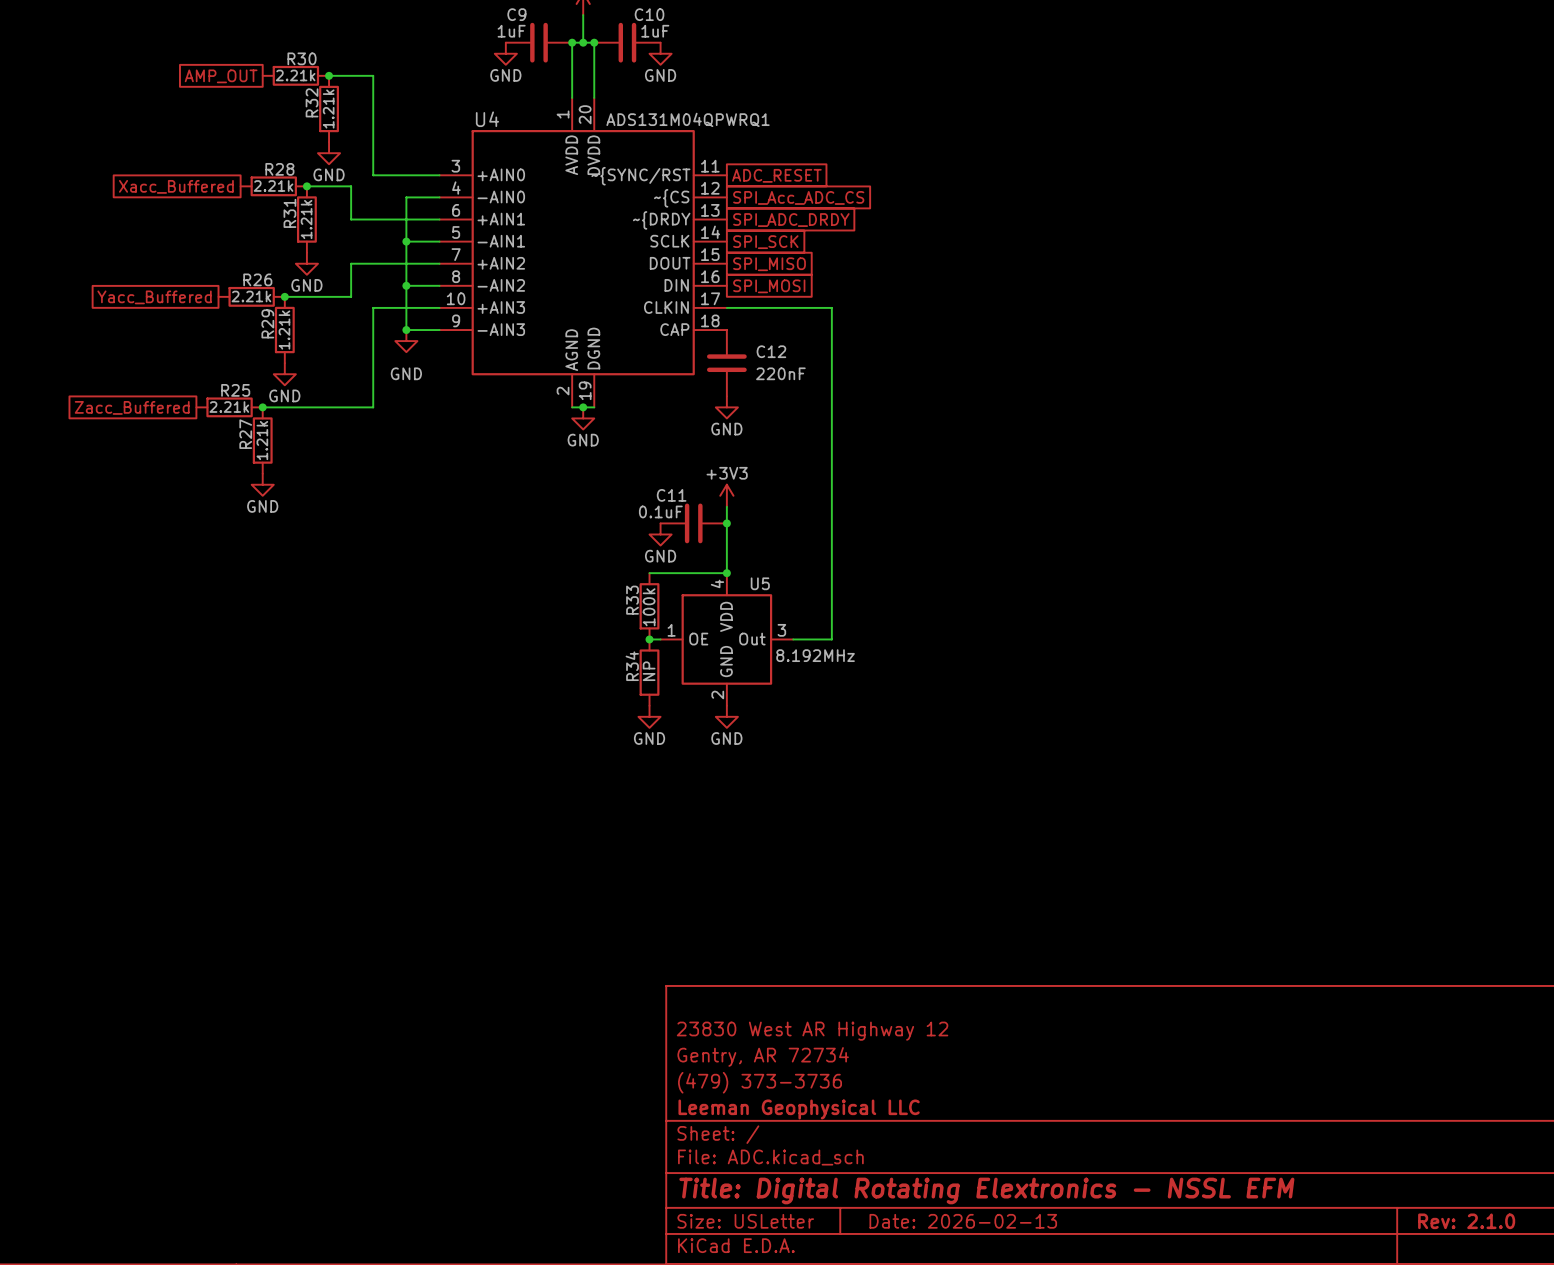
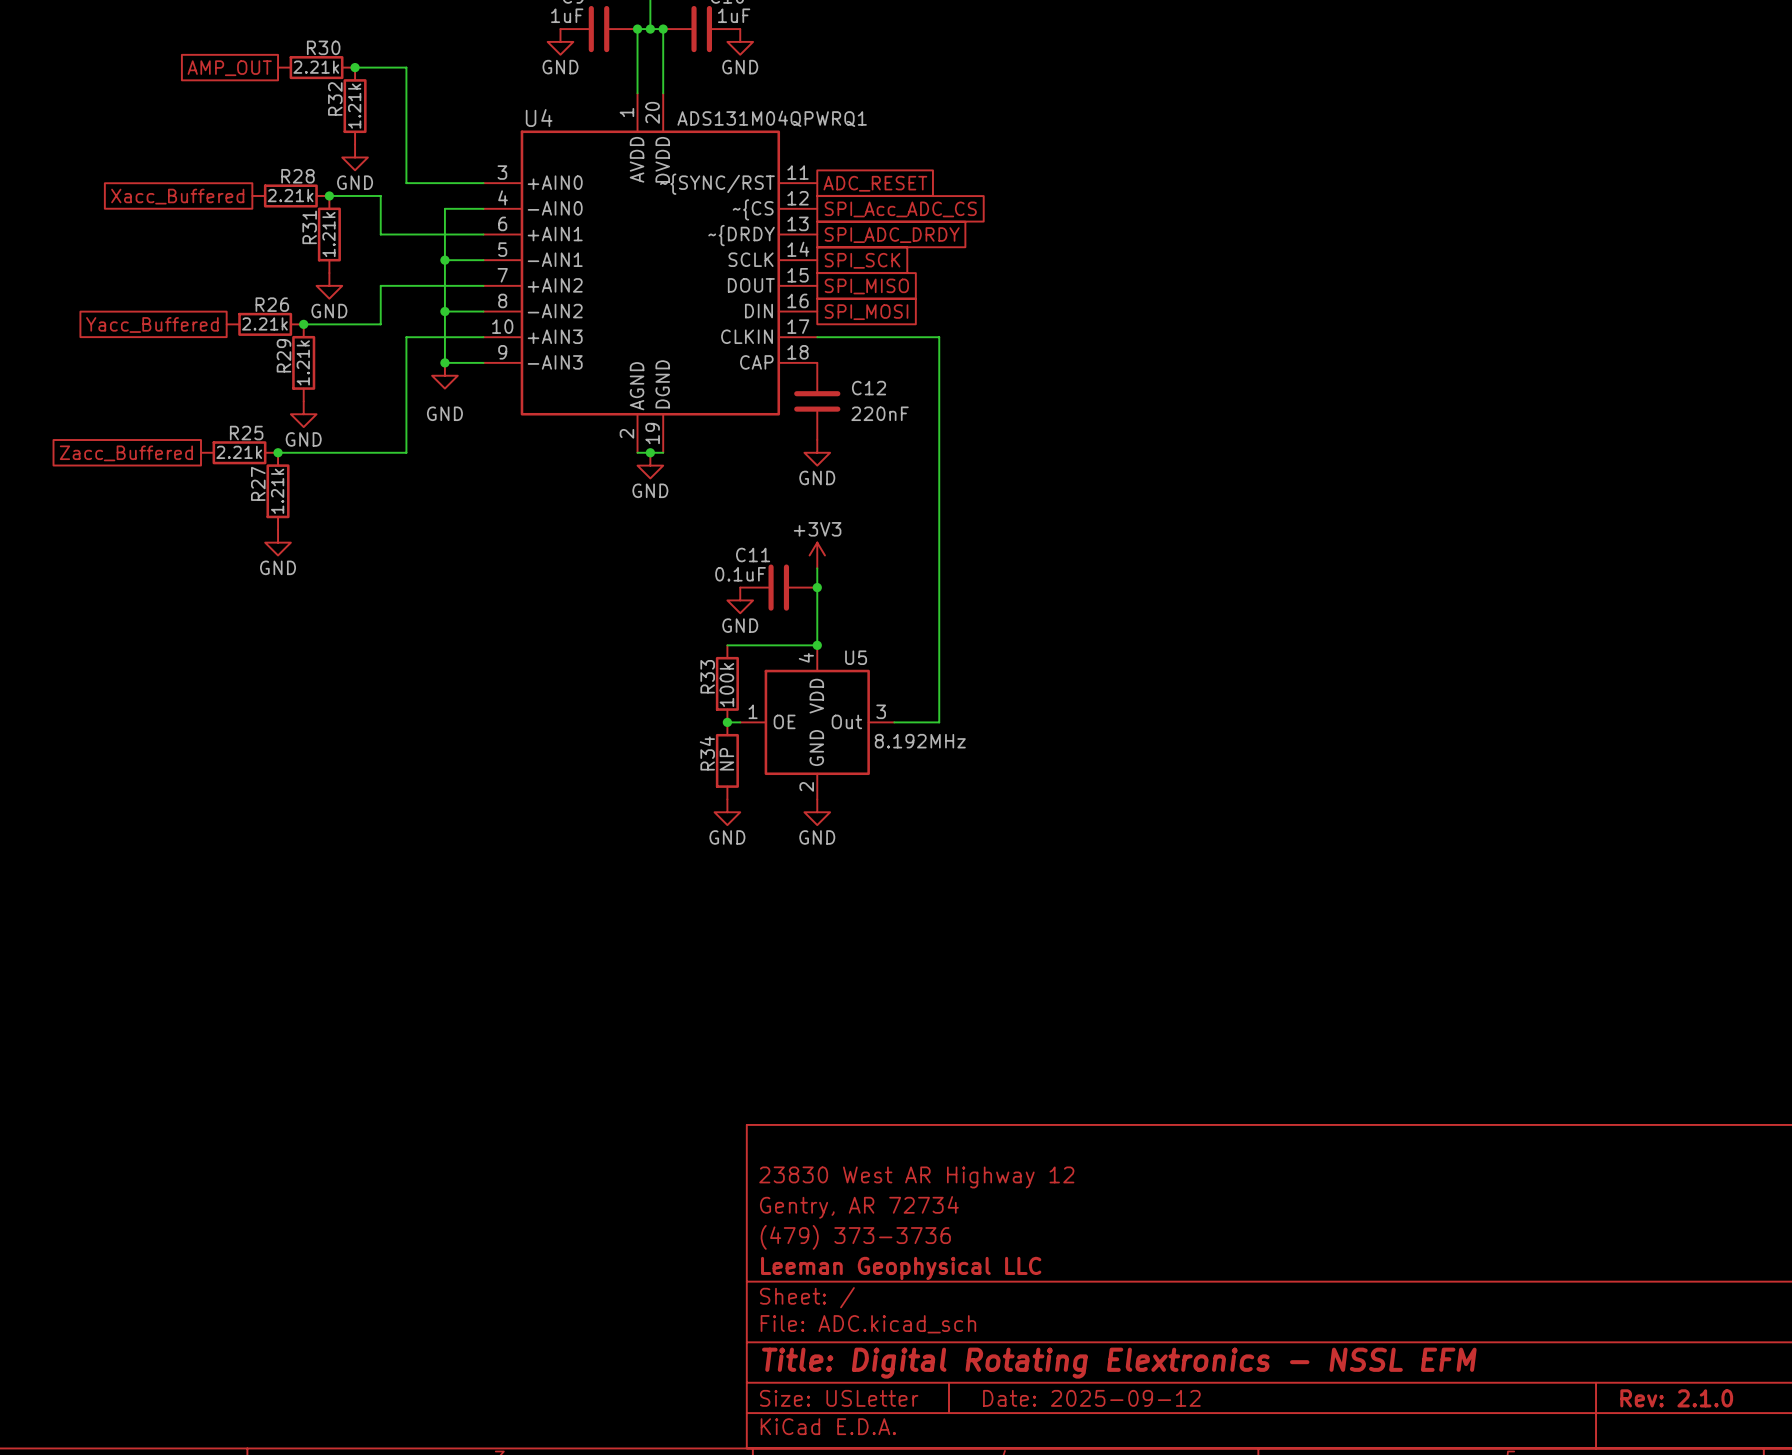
title block: Date: 2026-02-13 (963, 1221) -> Date: 2025-09-12 (1091, 1398)

